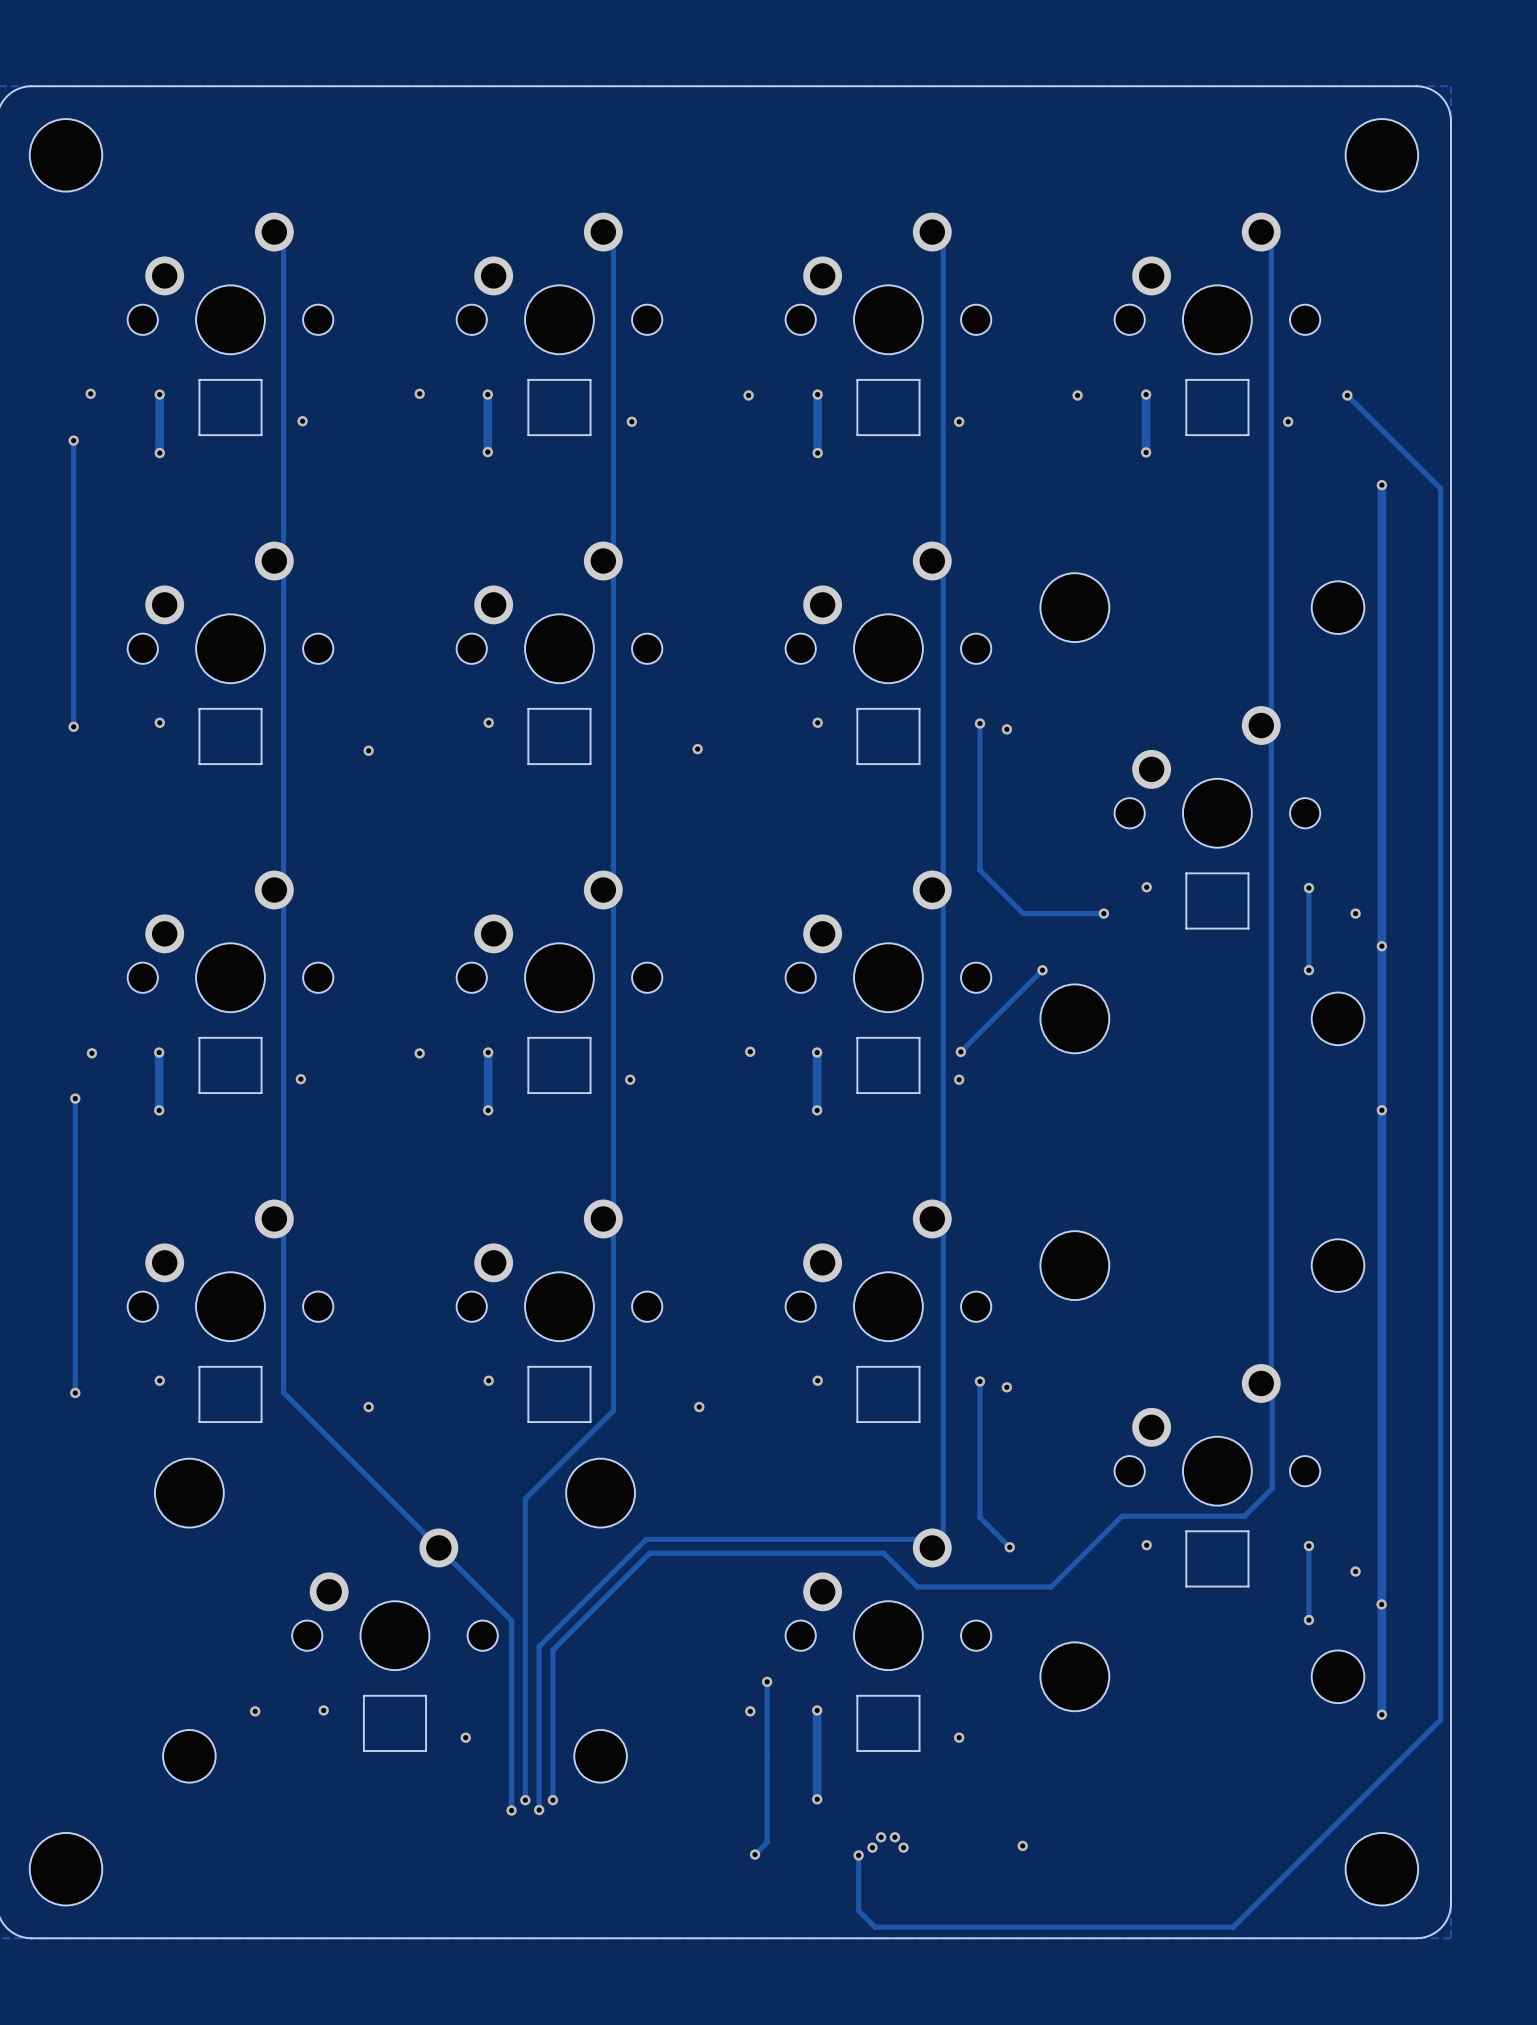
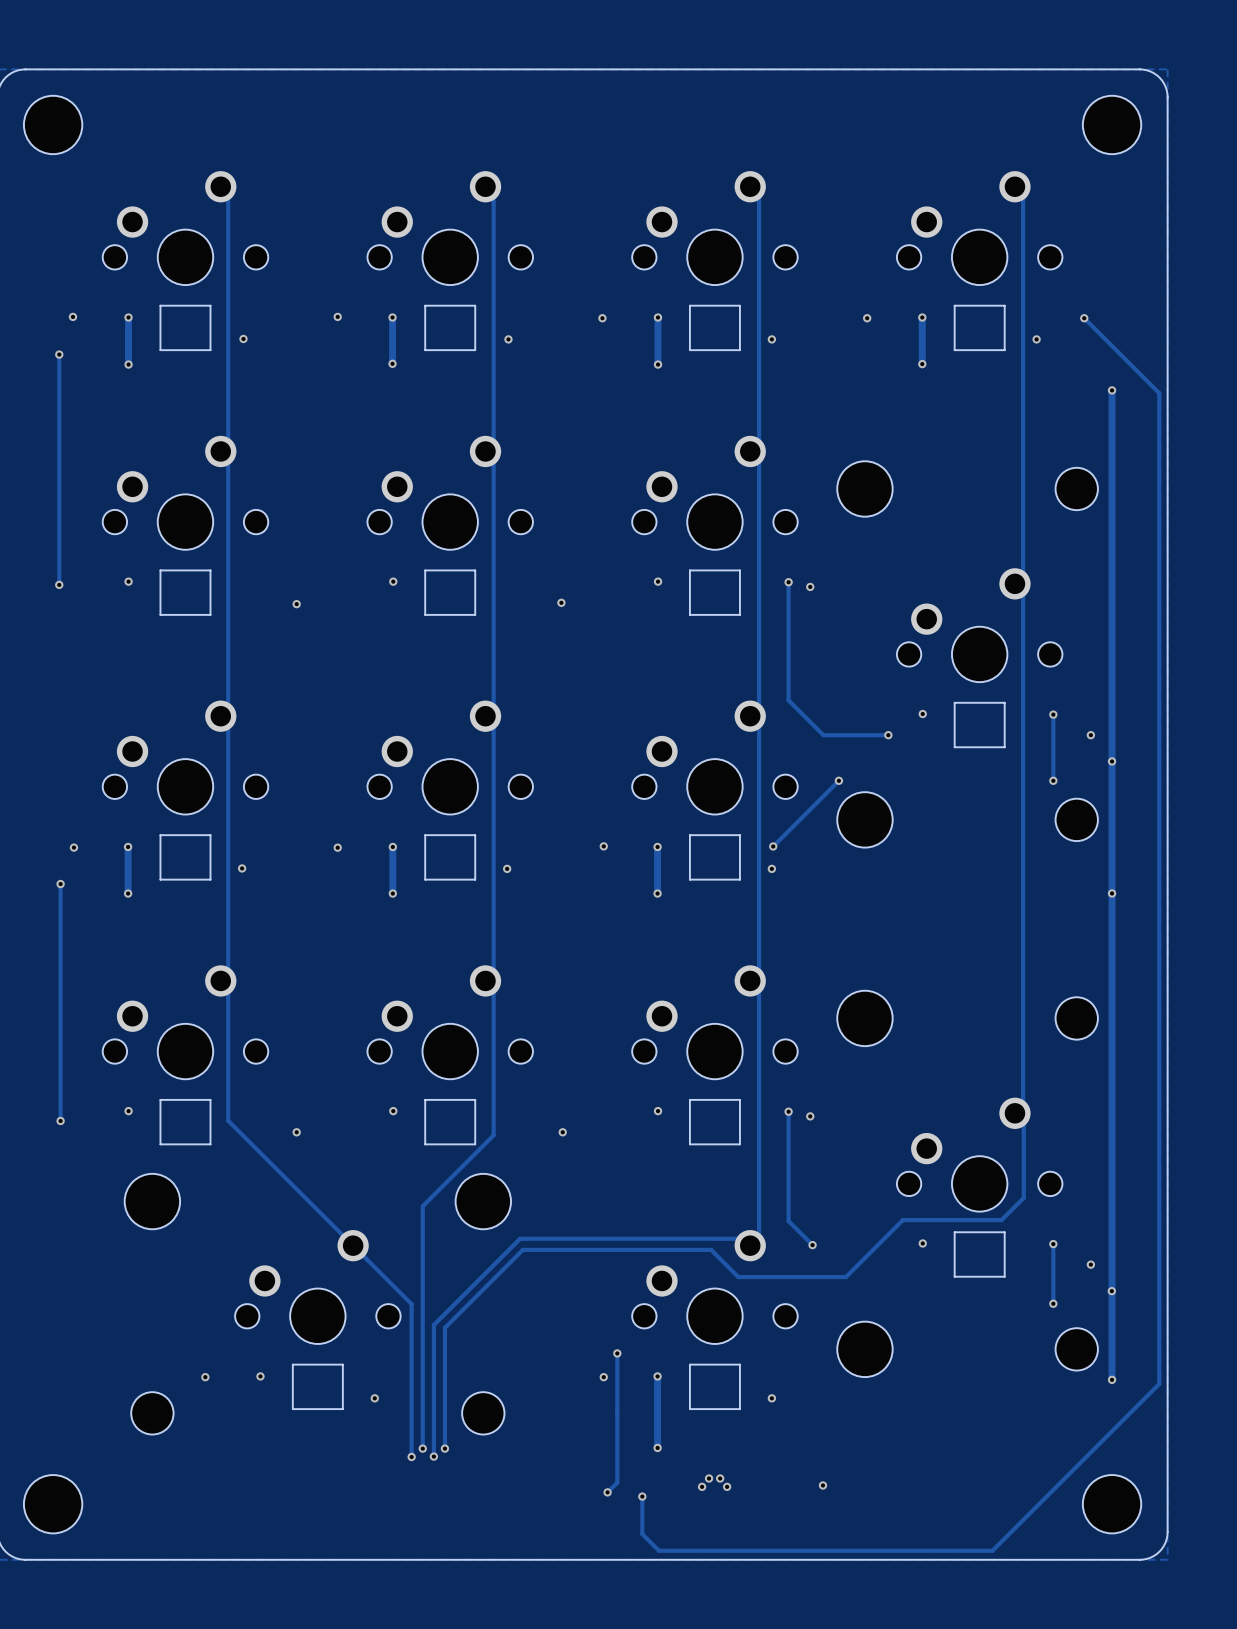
track: (858, 1855) (858, 1910) (875, 1927) -> (642, 1496) (642, 1534) (659, 1550) (704, 1550)
via position: (858, 1855) -> (642, 1496)

